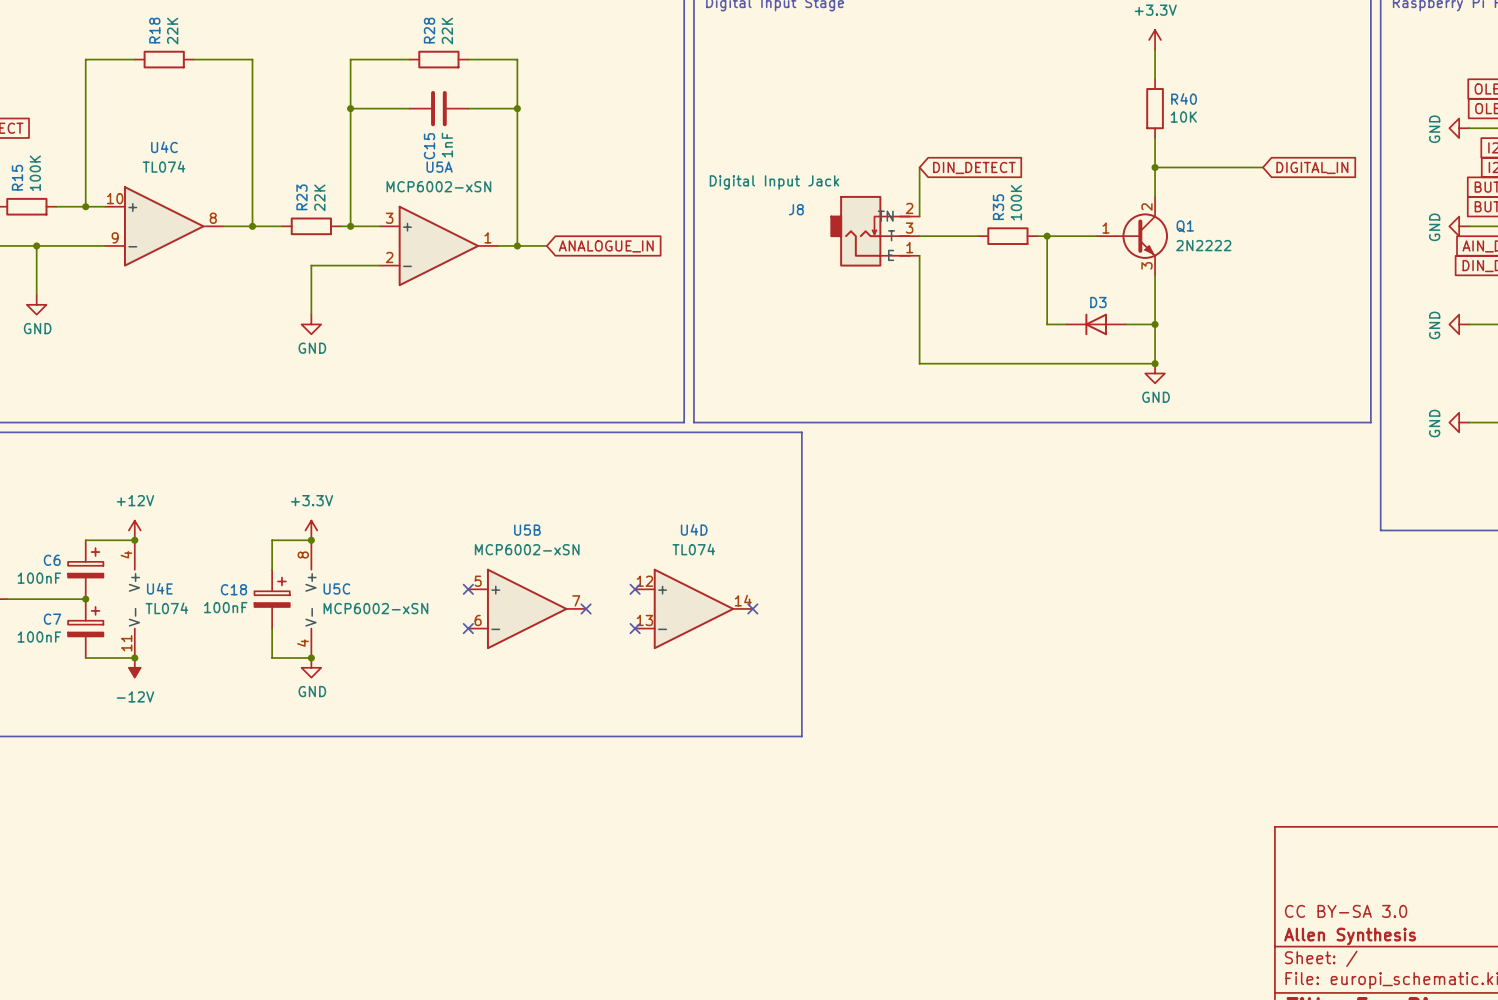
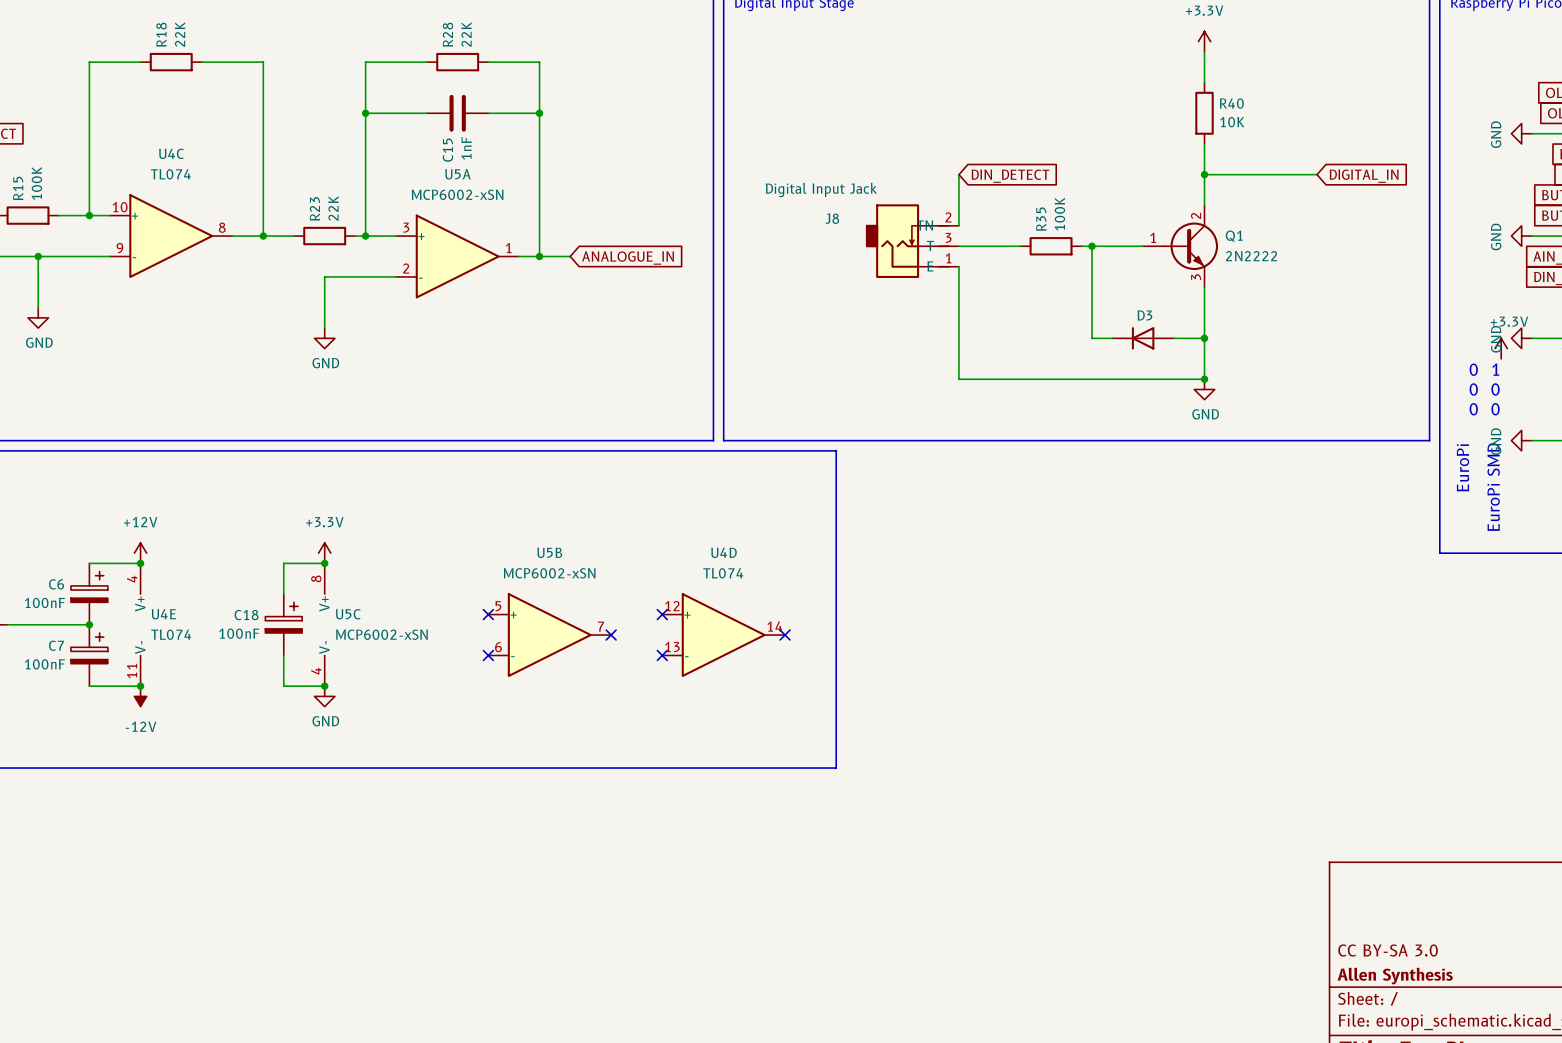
power symbol: none -> +3.3V (1501, 348)
text: none -> 0 1 (1484, 369)
text: none -> 0 0 (1484, 389)
text: none -> 0 0 (1484, 409)
text: none -> EuroPi (1463, 467)
text: none -> EuroPi SMD (1493, 487)

